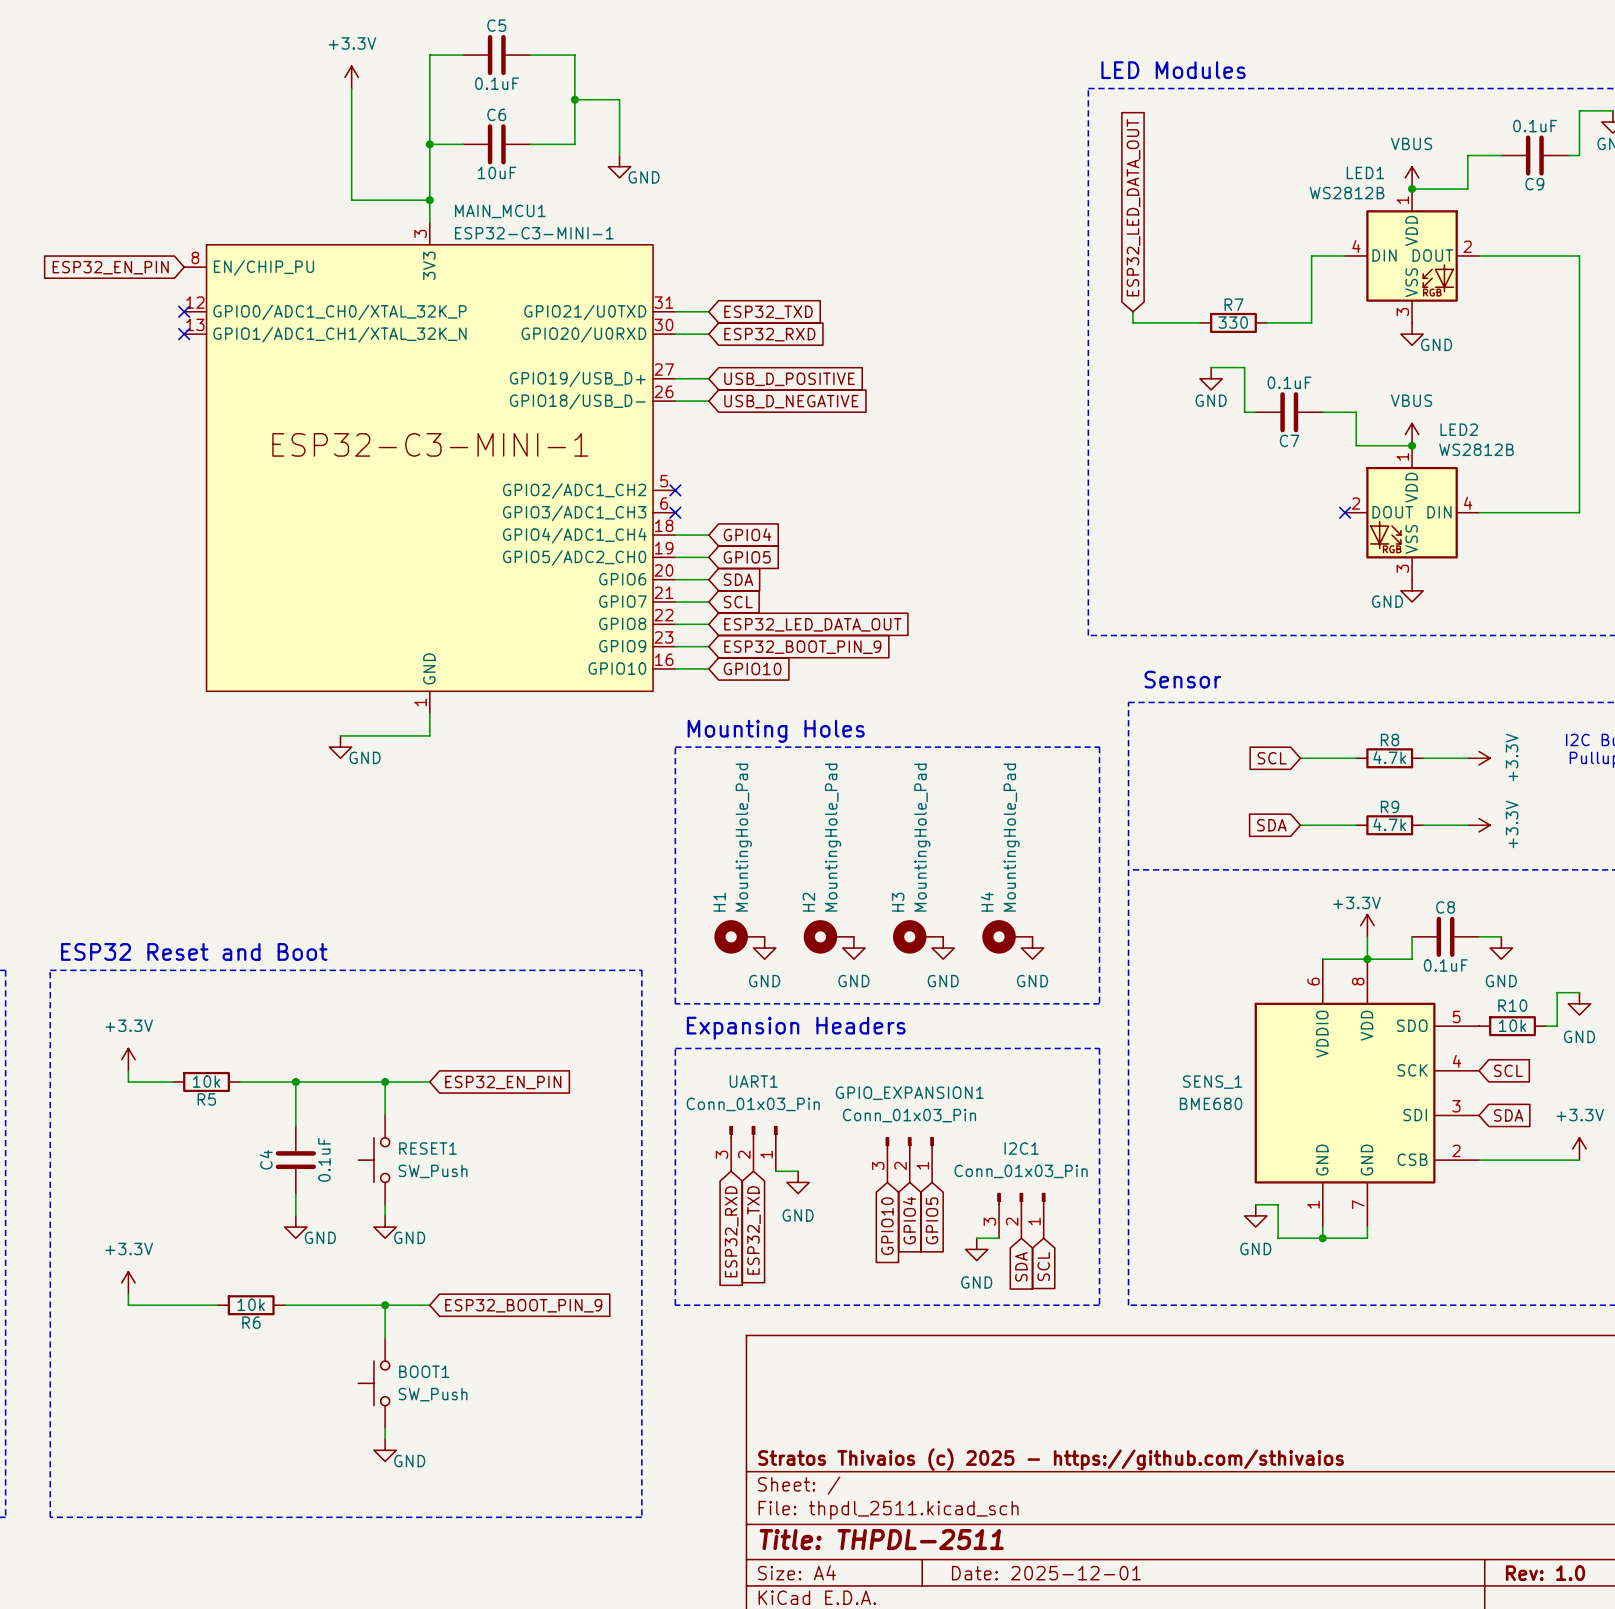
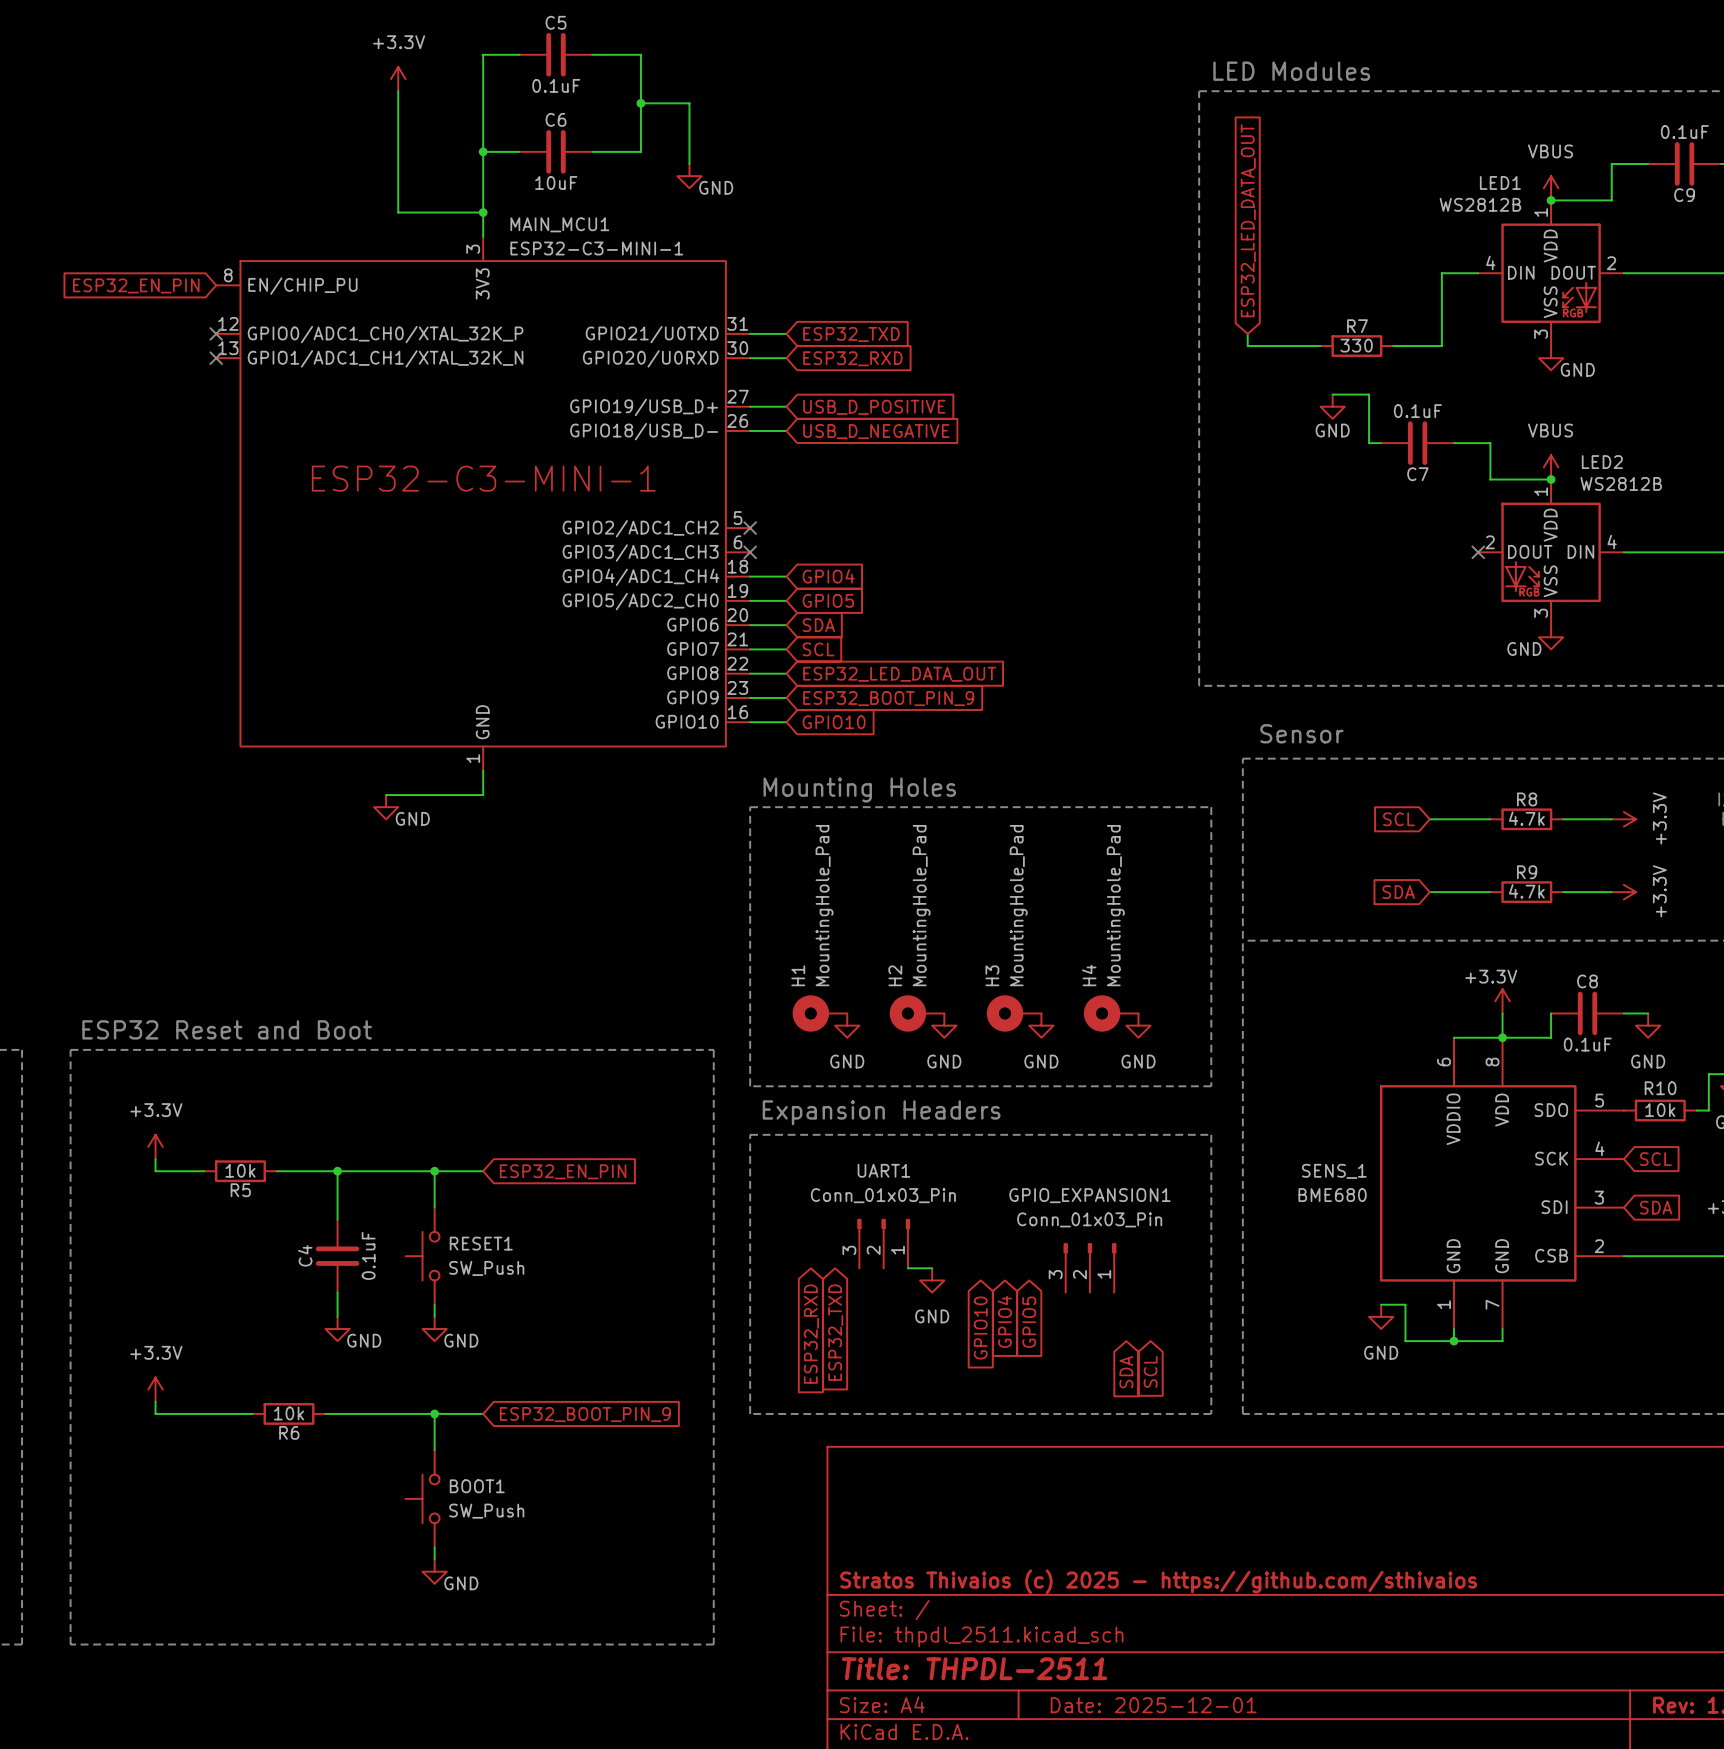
UART1 position: (753, 1148) -> (883, 1243)
GPIO_EXPANSION1 position: (909, 1159) -> (1089, 1267)
wire: (775, 1171) (798, 1171) -> (907, 1268) (932, 1268)
power symbol position: GND (798, 1182) -> GND (932, 1280)
I2C1: Conn_01x03_Pin (1021, 1215) -> none
wire: (976, 1238) (999, 1238) -> none
power symbol: GND (976, 1249) -> none

